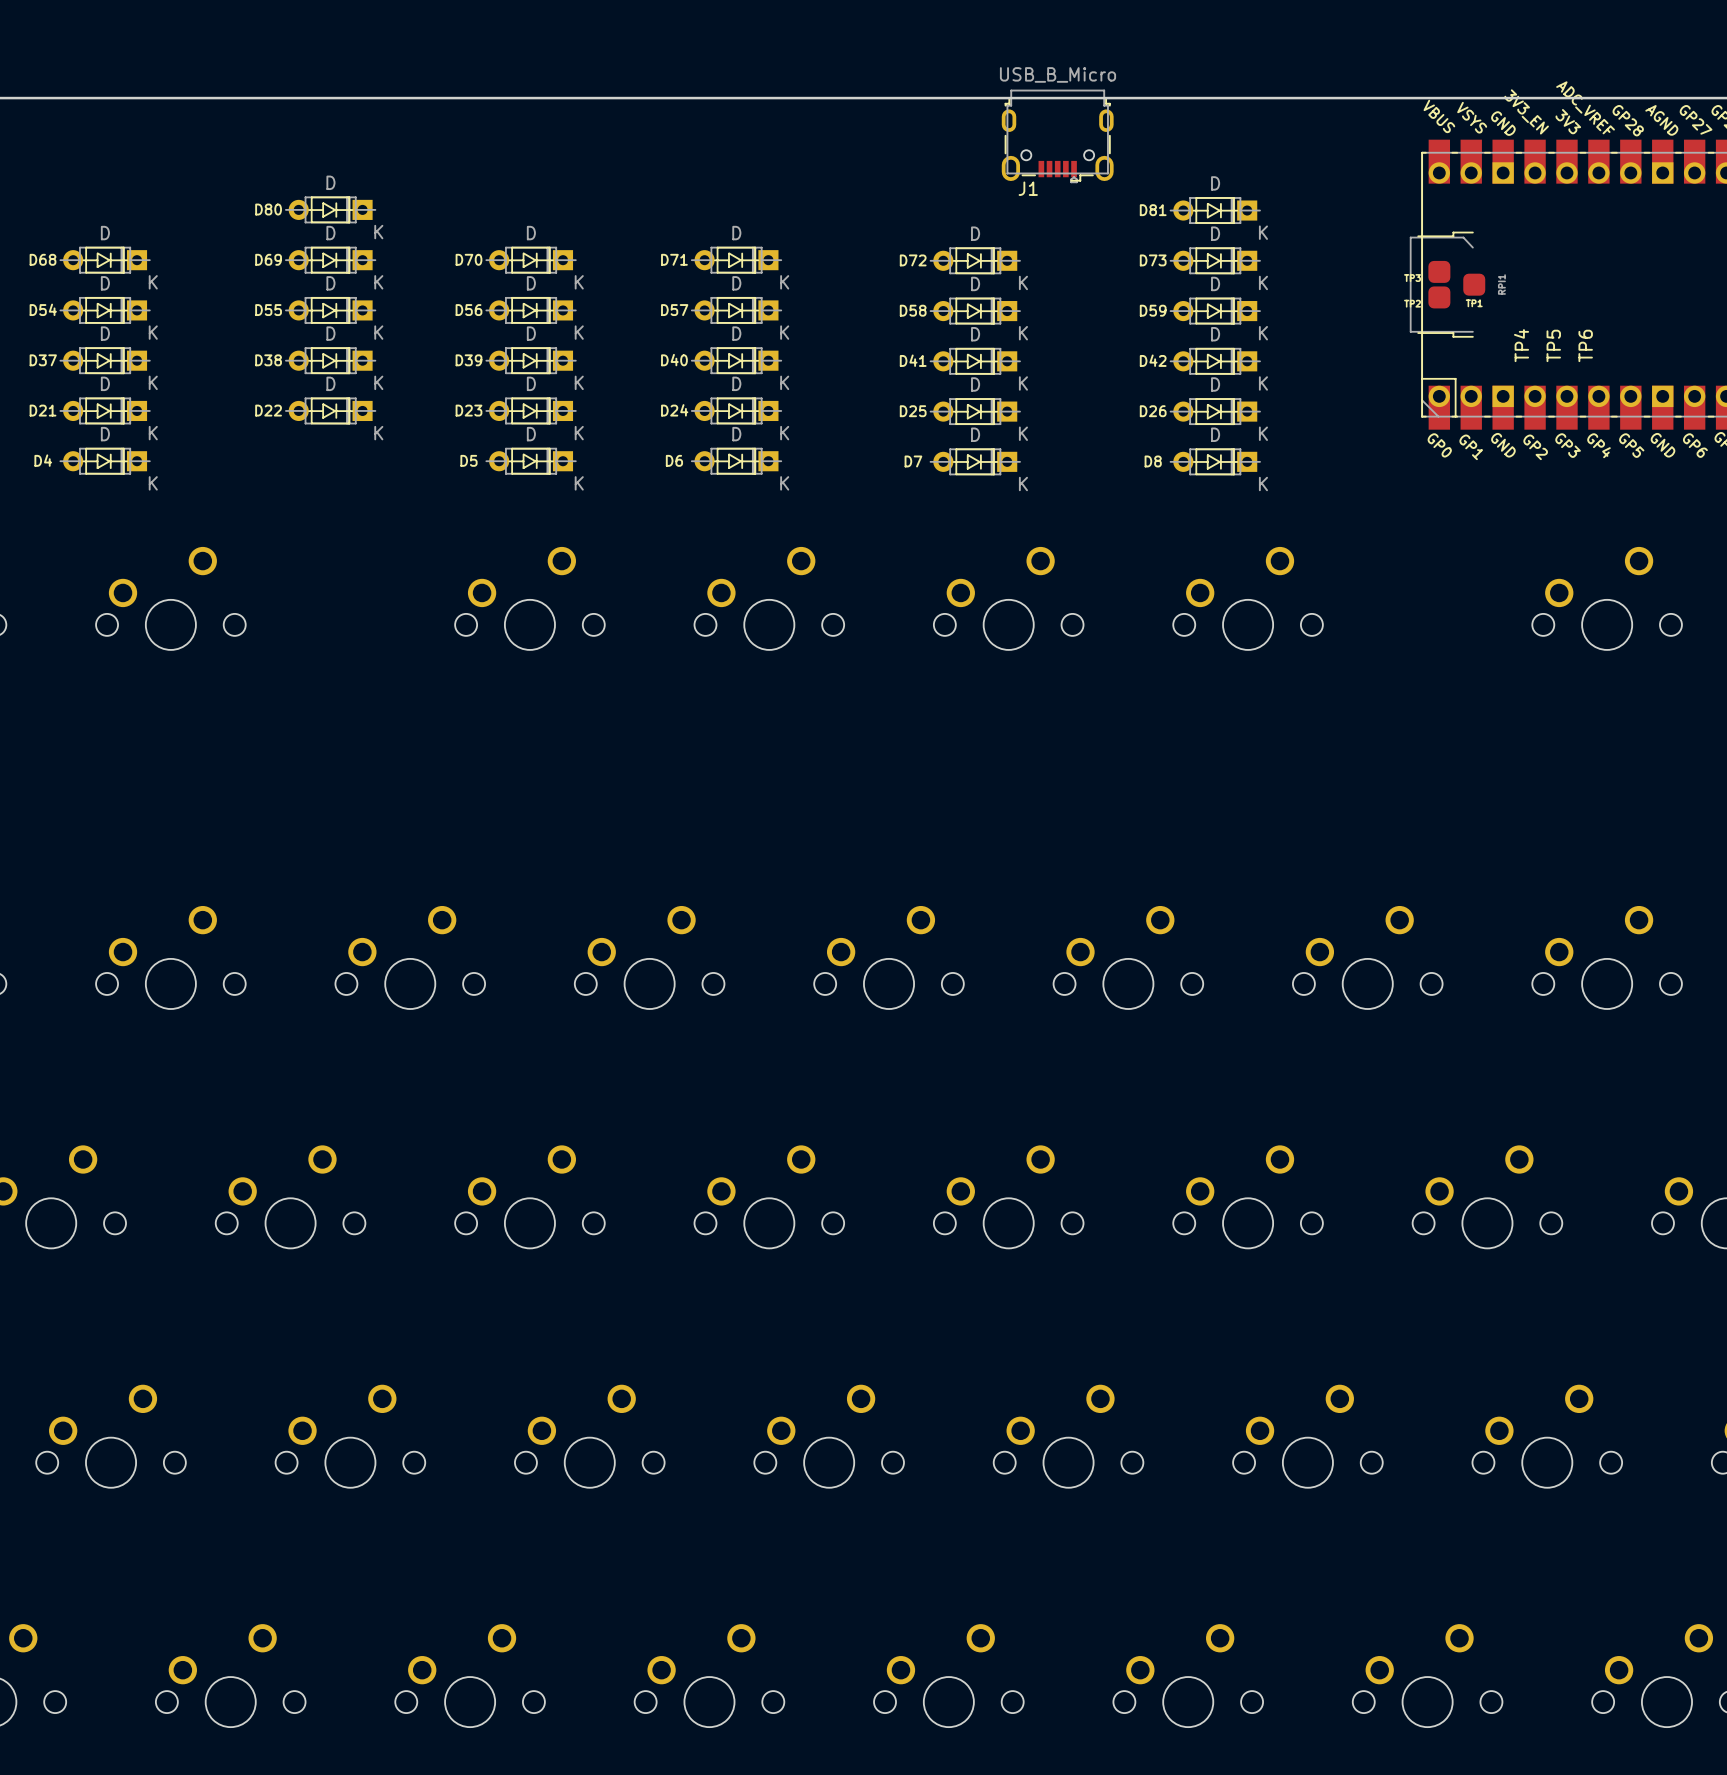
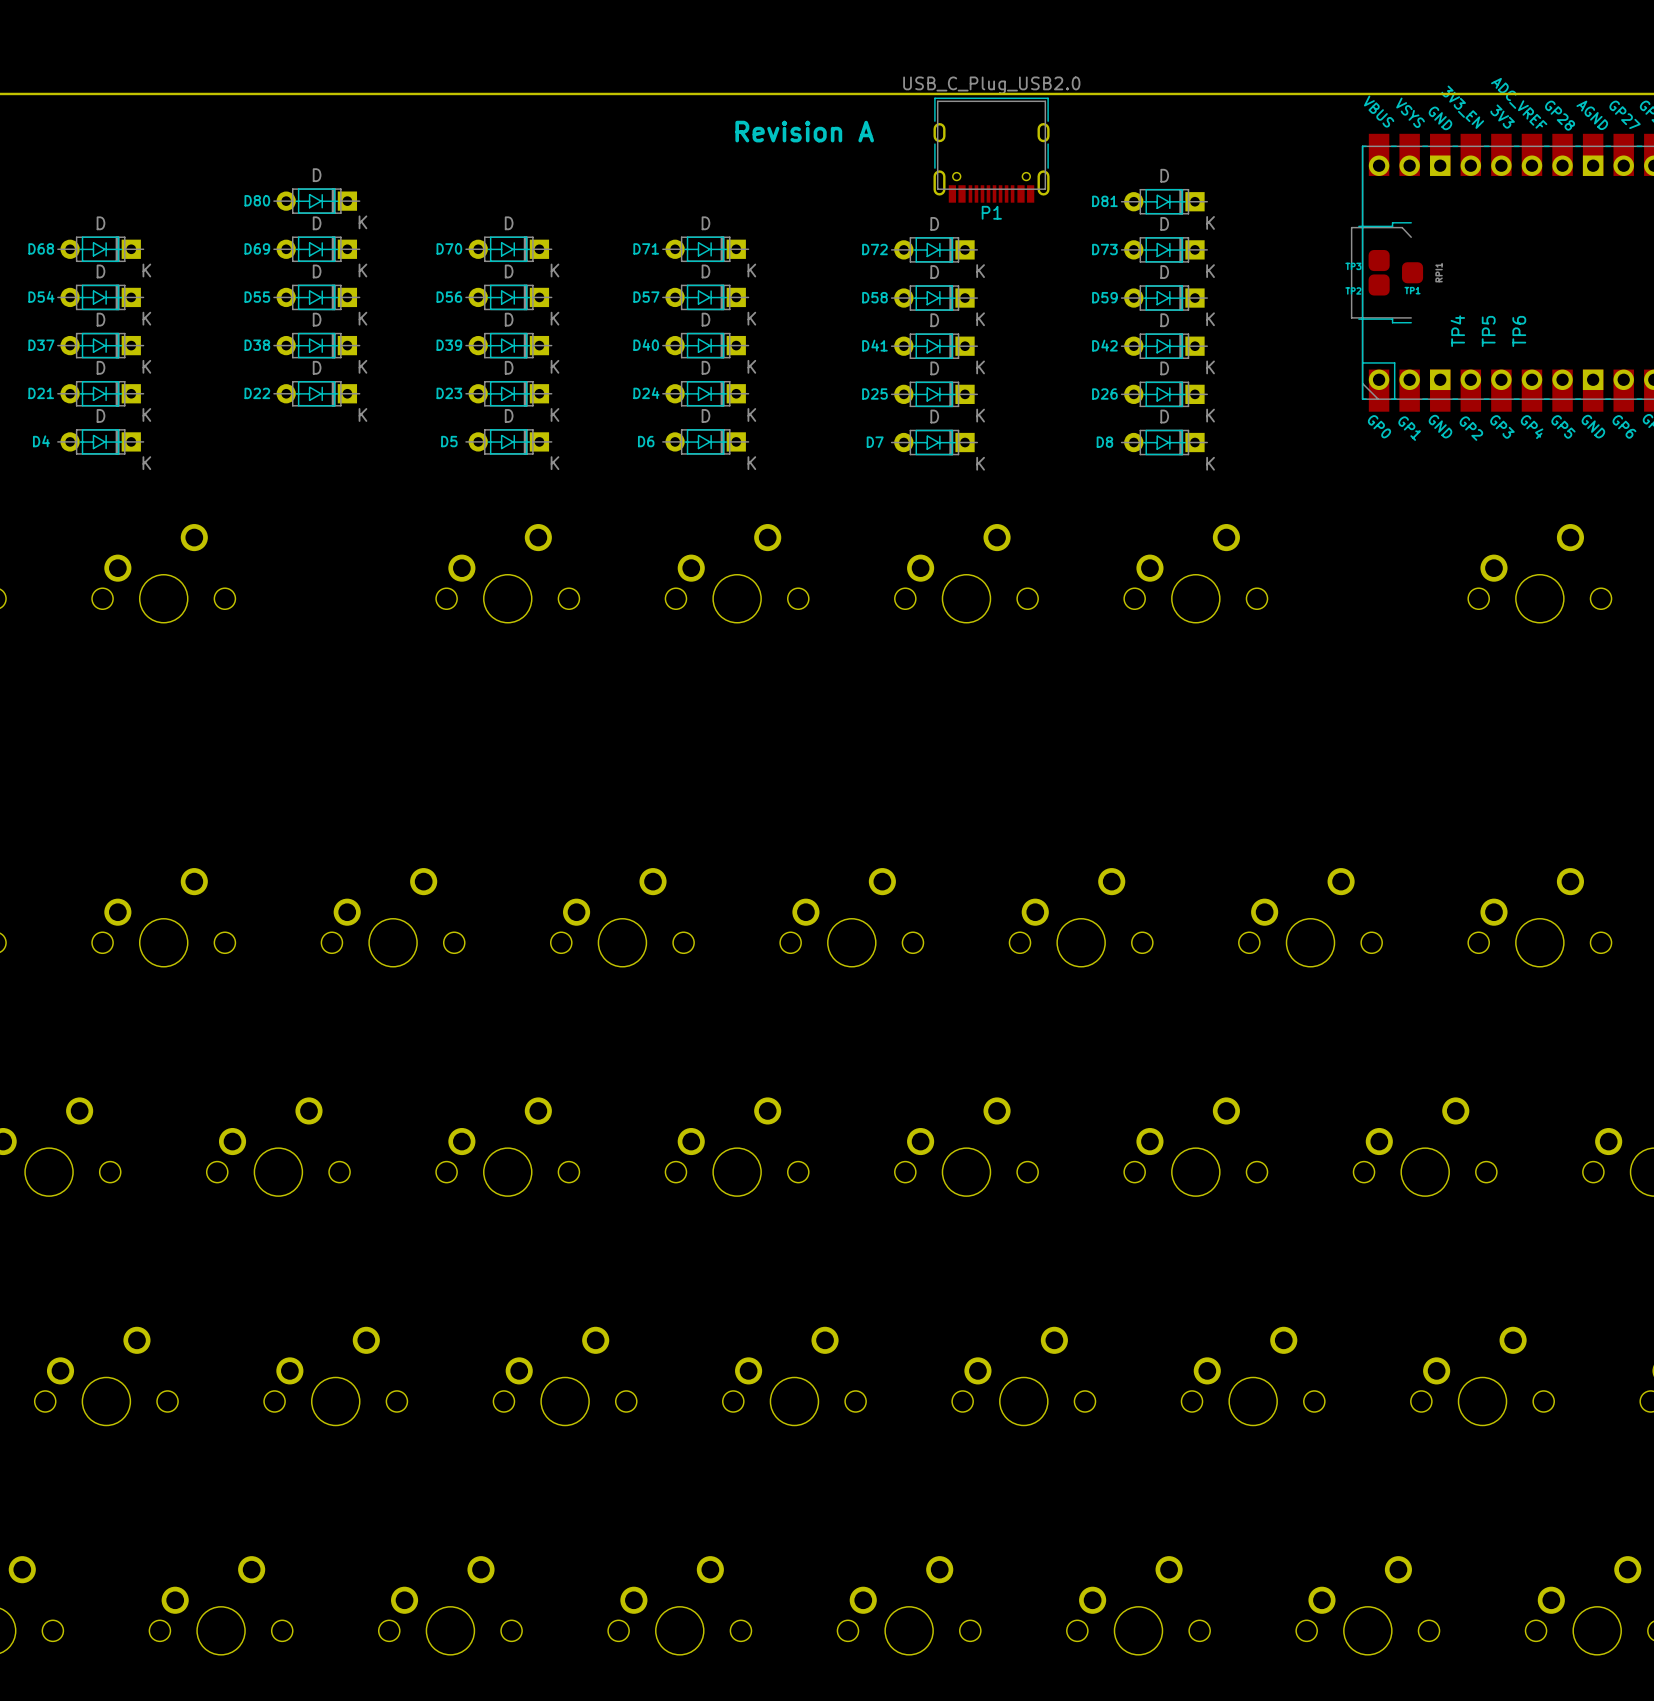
J1: USB_B_Micro (1057, 136) -> none
text: none -> Revision A (804, 131)
P1: none -> USB_C_Plug_USB2.0 (991, 150)

